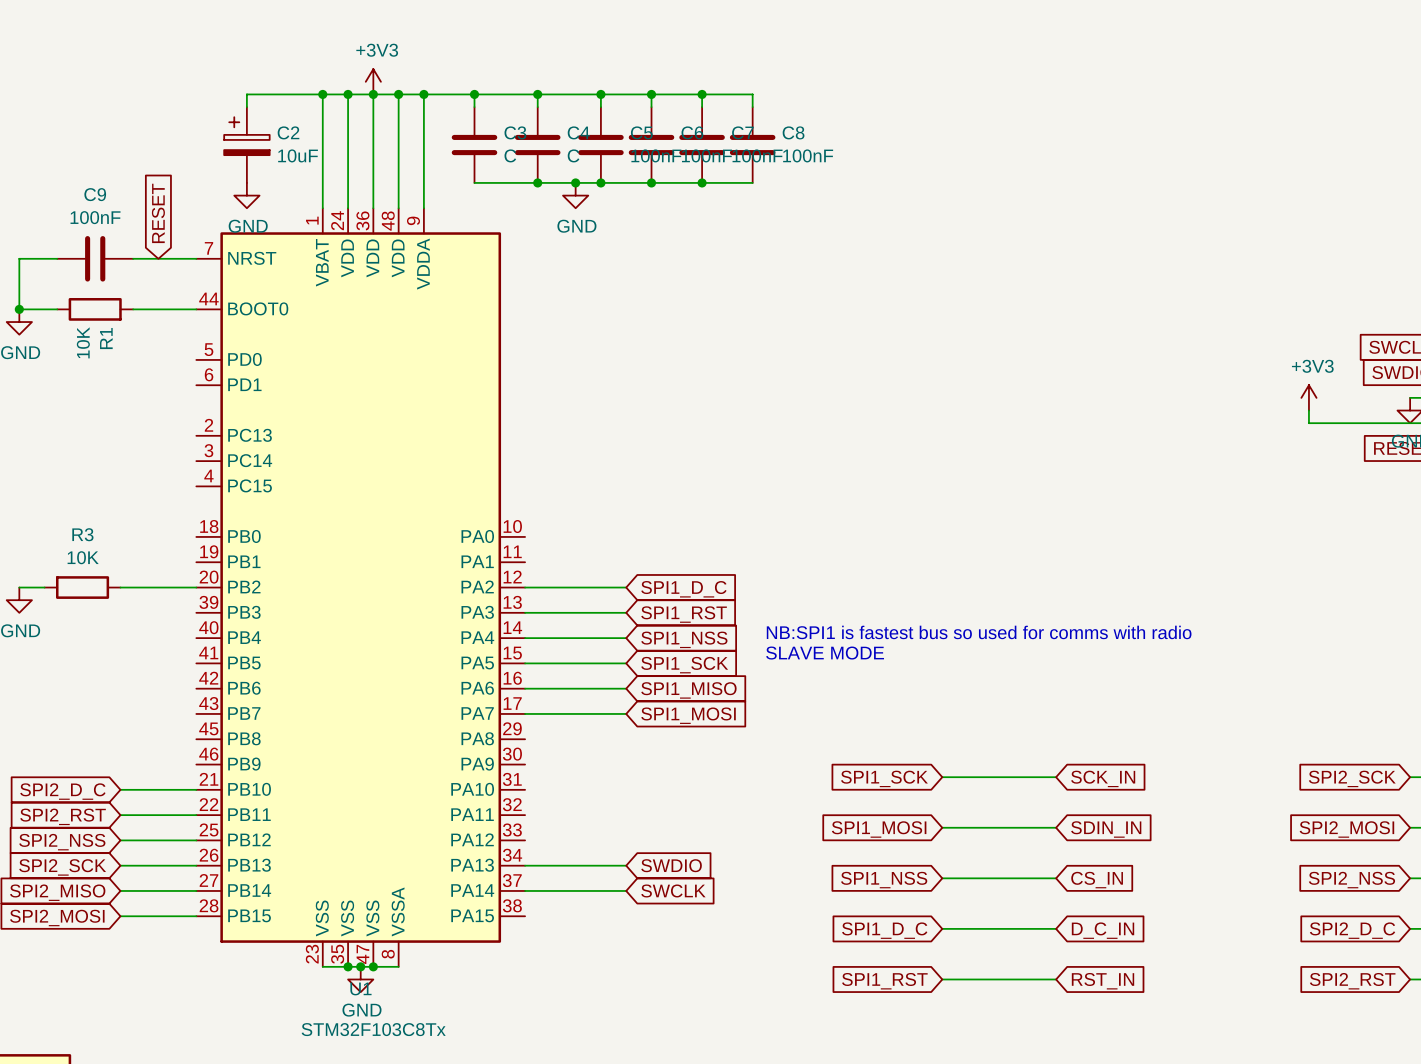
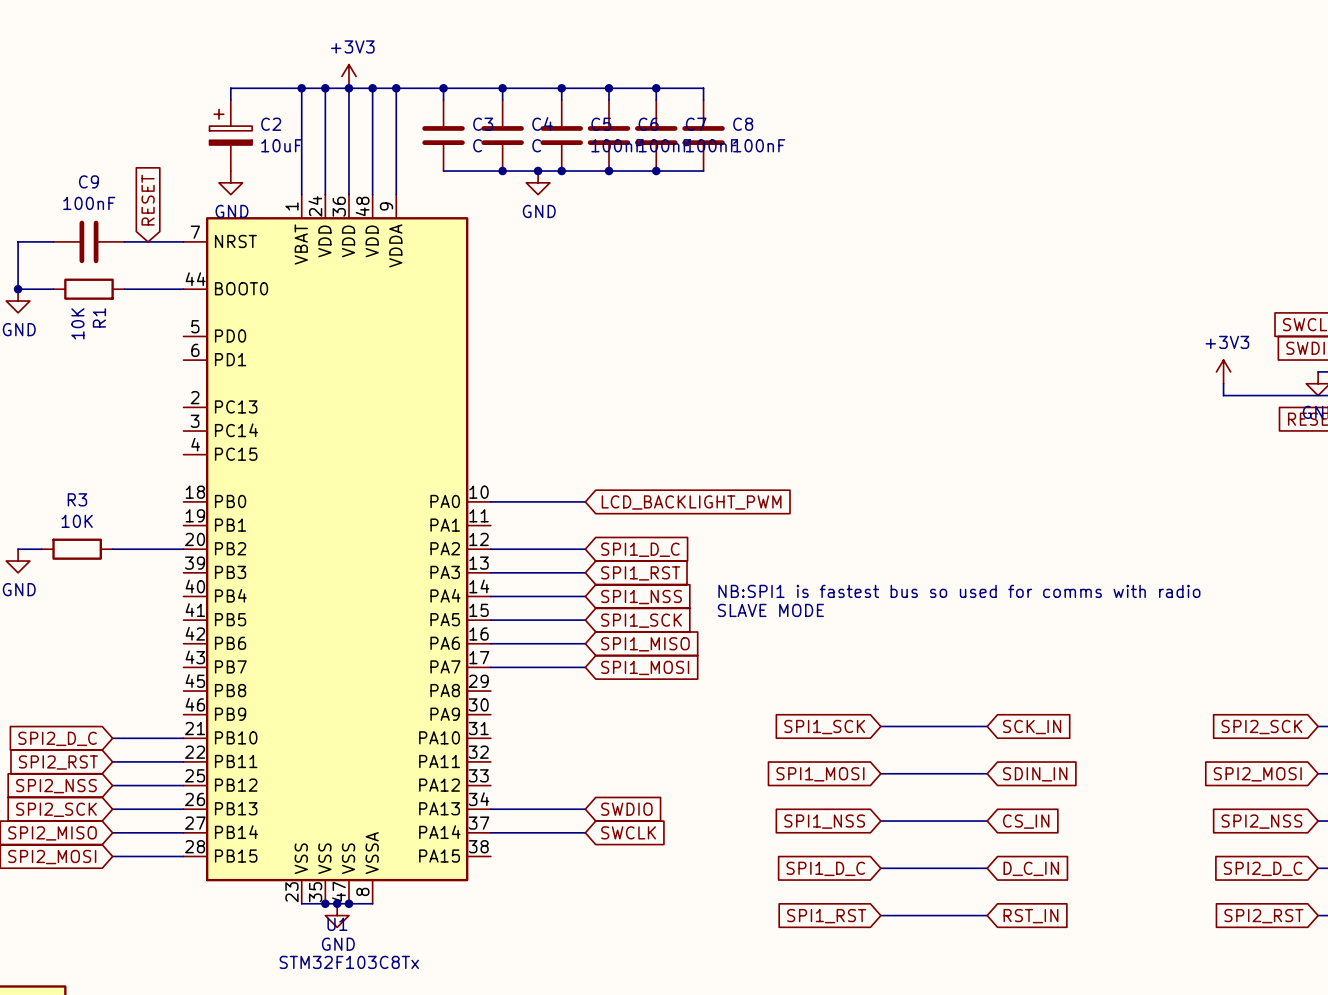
wire: none -> (490, 501) (585, 501)
global label: none -> LCD_BACKLIGHT_PWM (691, 502)

